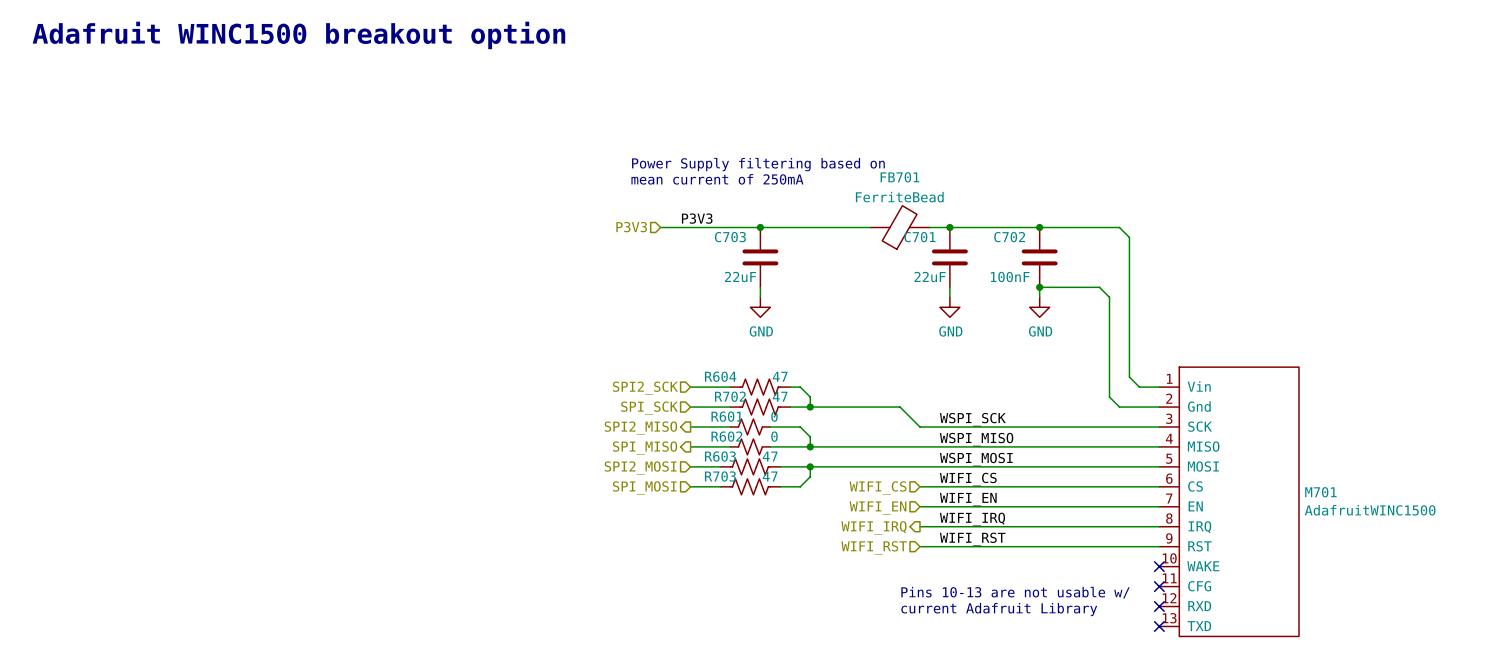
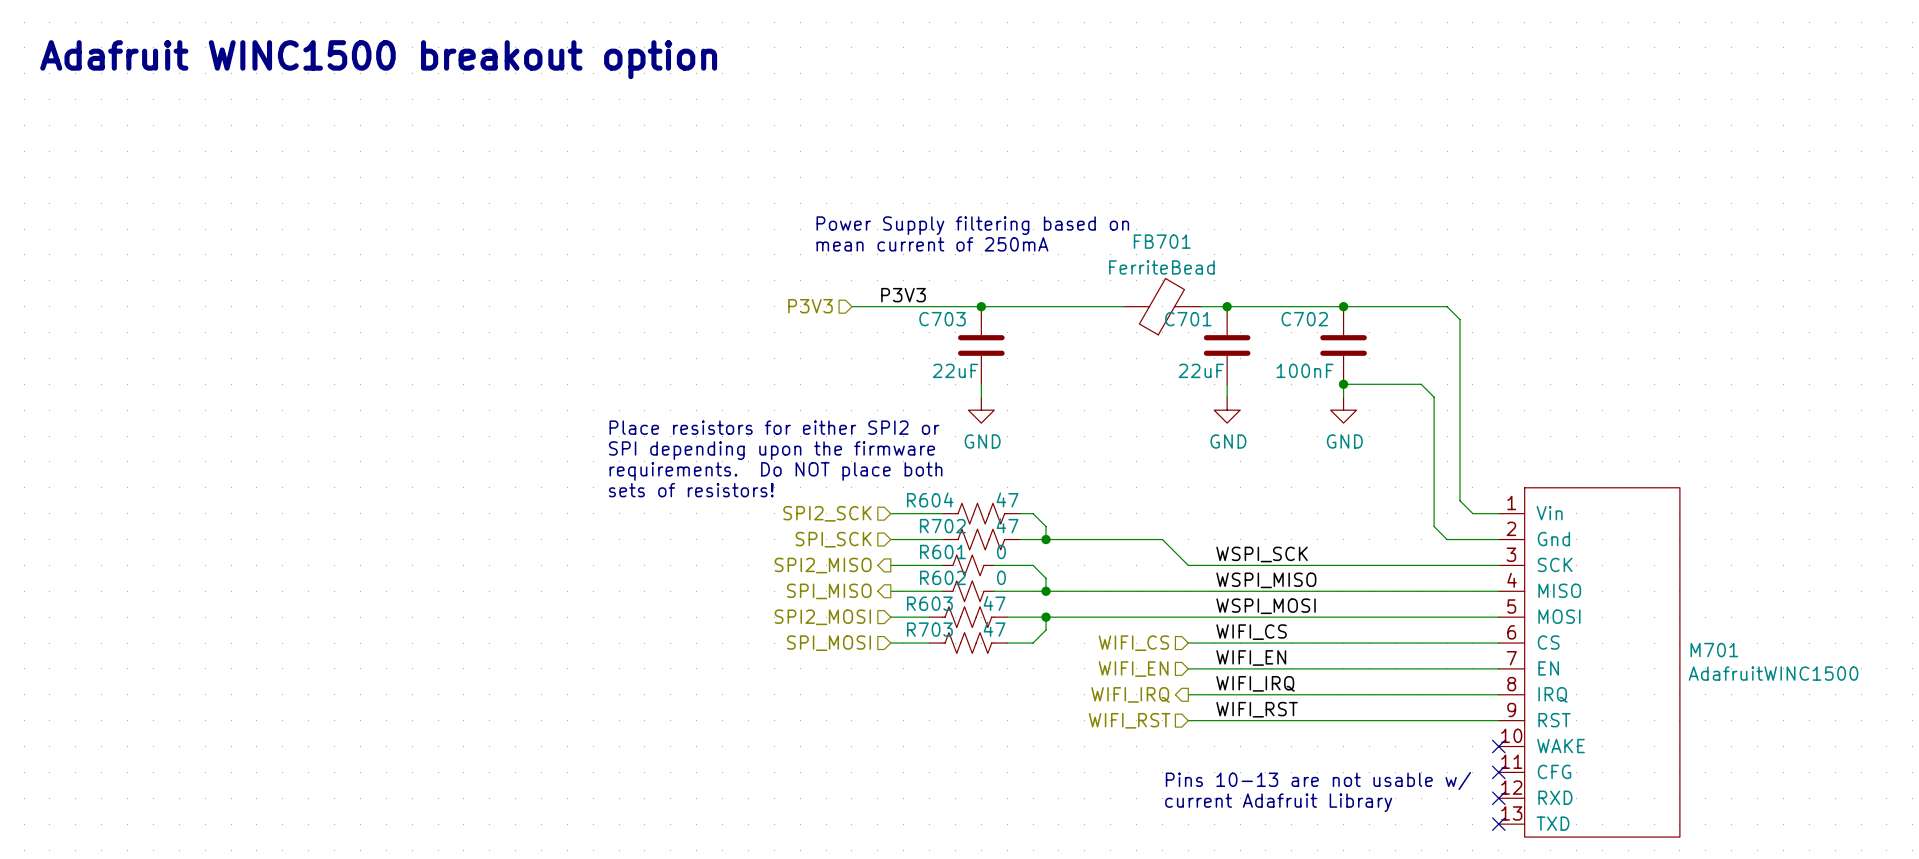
text: none -> Place resistors for either SPI2 or (774, 427)
text: none -> SPI depending upon the firmware (771, 450)
text: none -> requirements. Do NOT place both (776, 471)
text: none -> sets of resistors! (691, 490)

